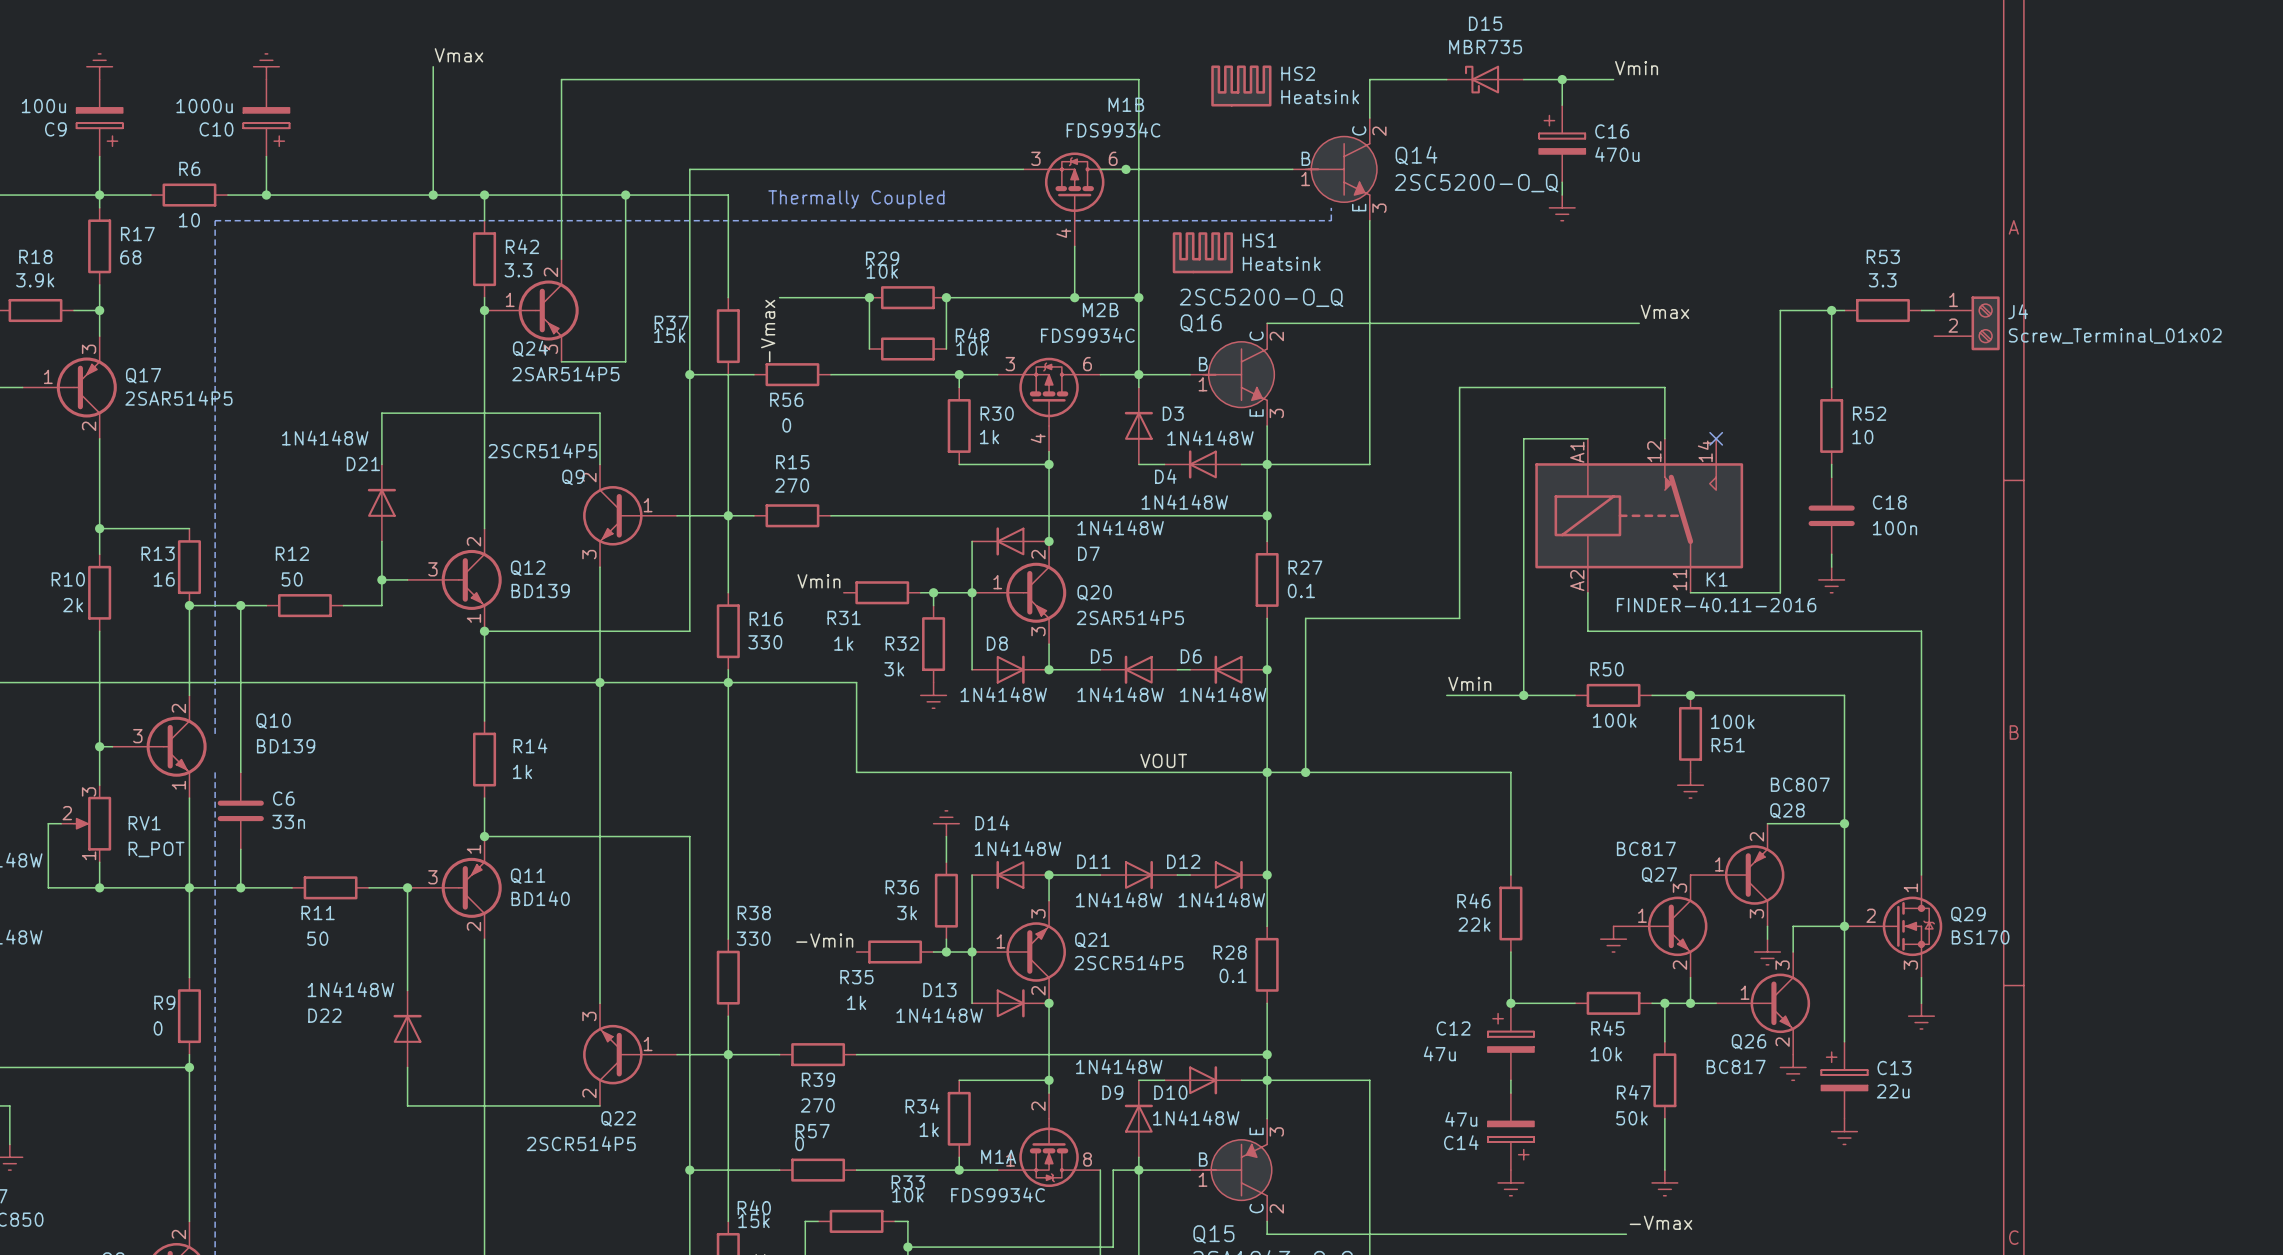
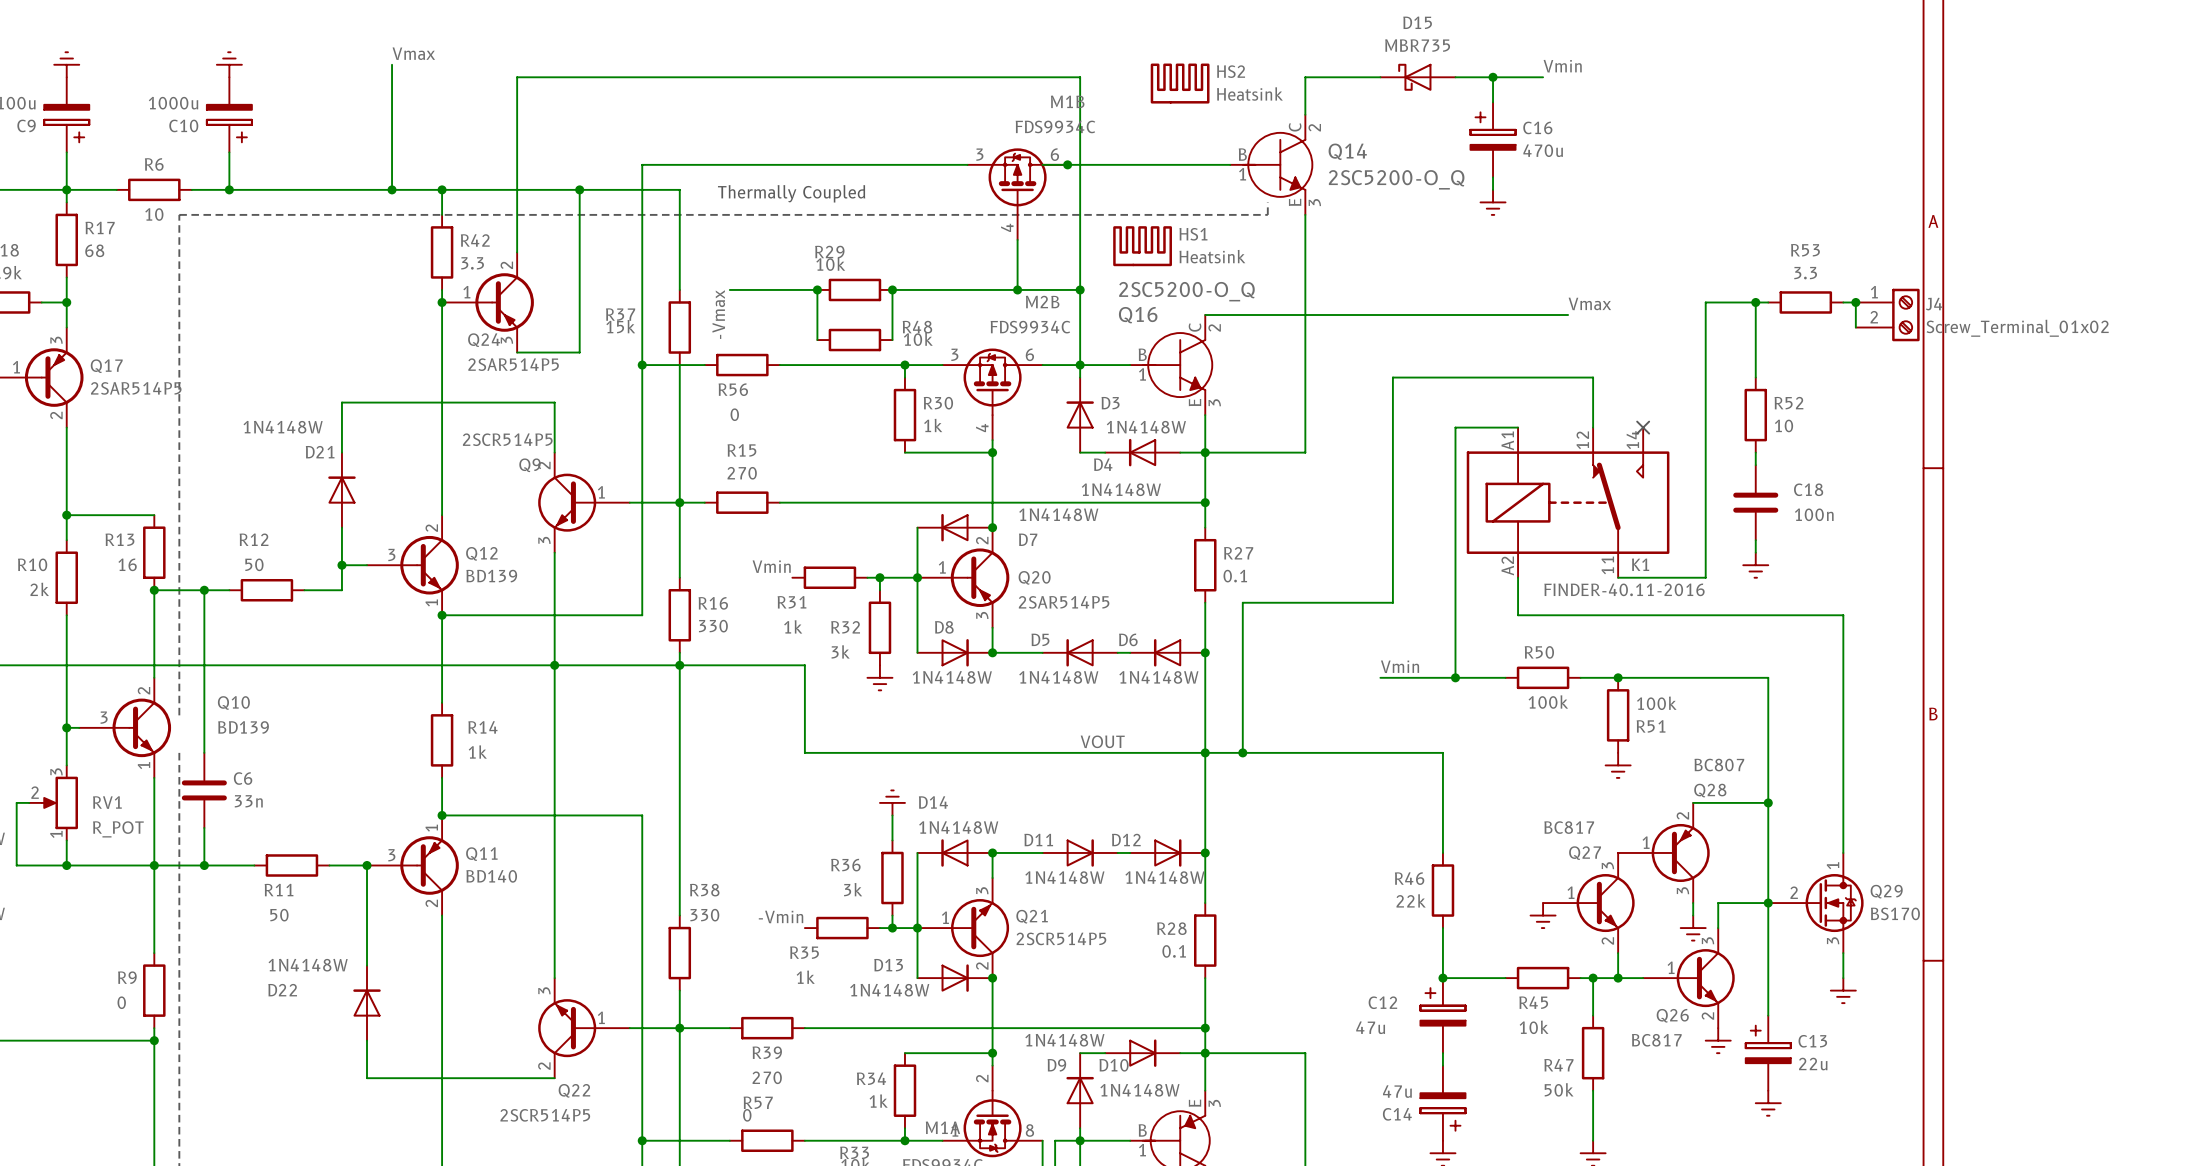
wire: none -> (1855, 302) (1855, 327)
junction: none -> (1855, 302)

